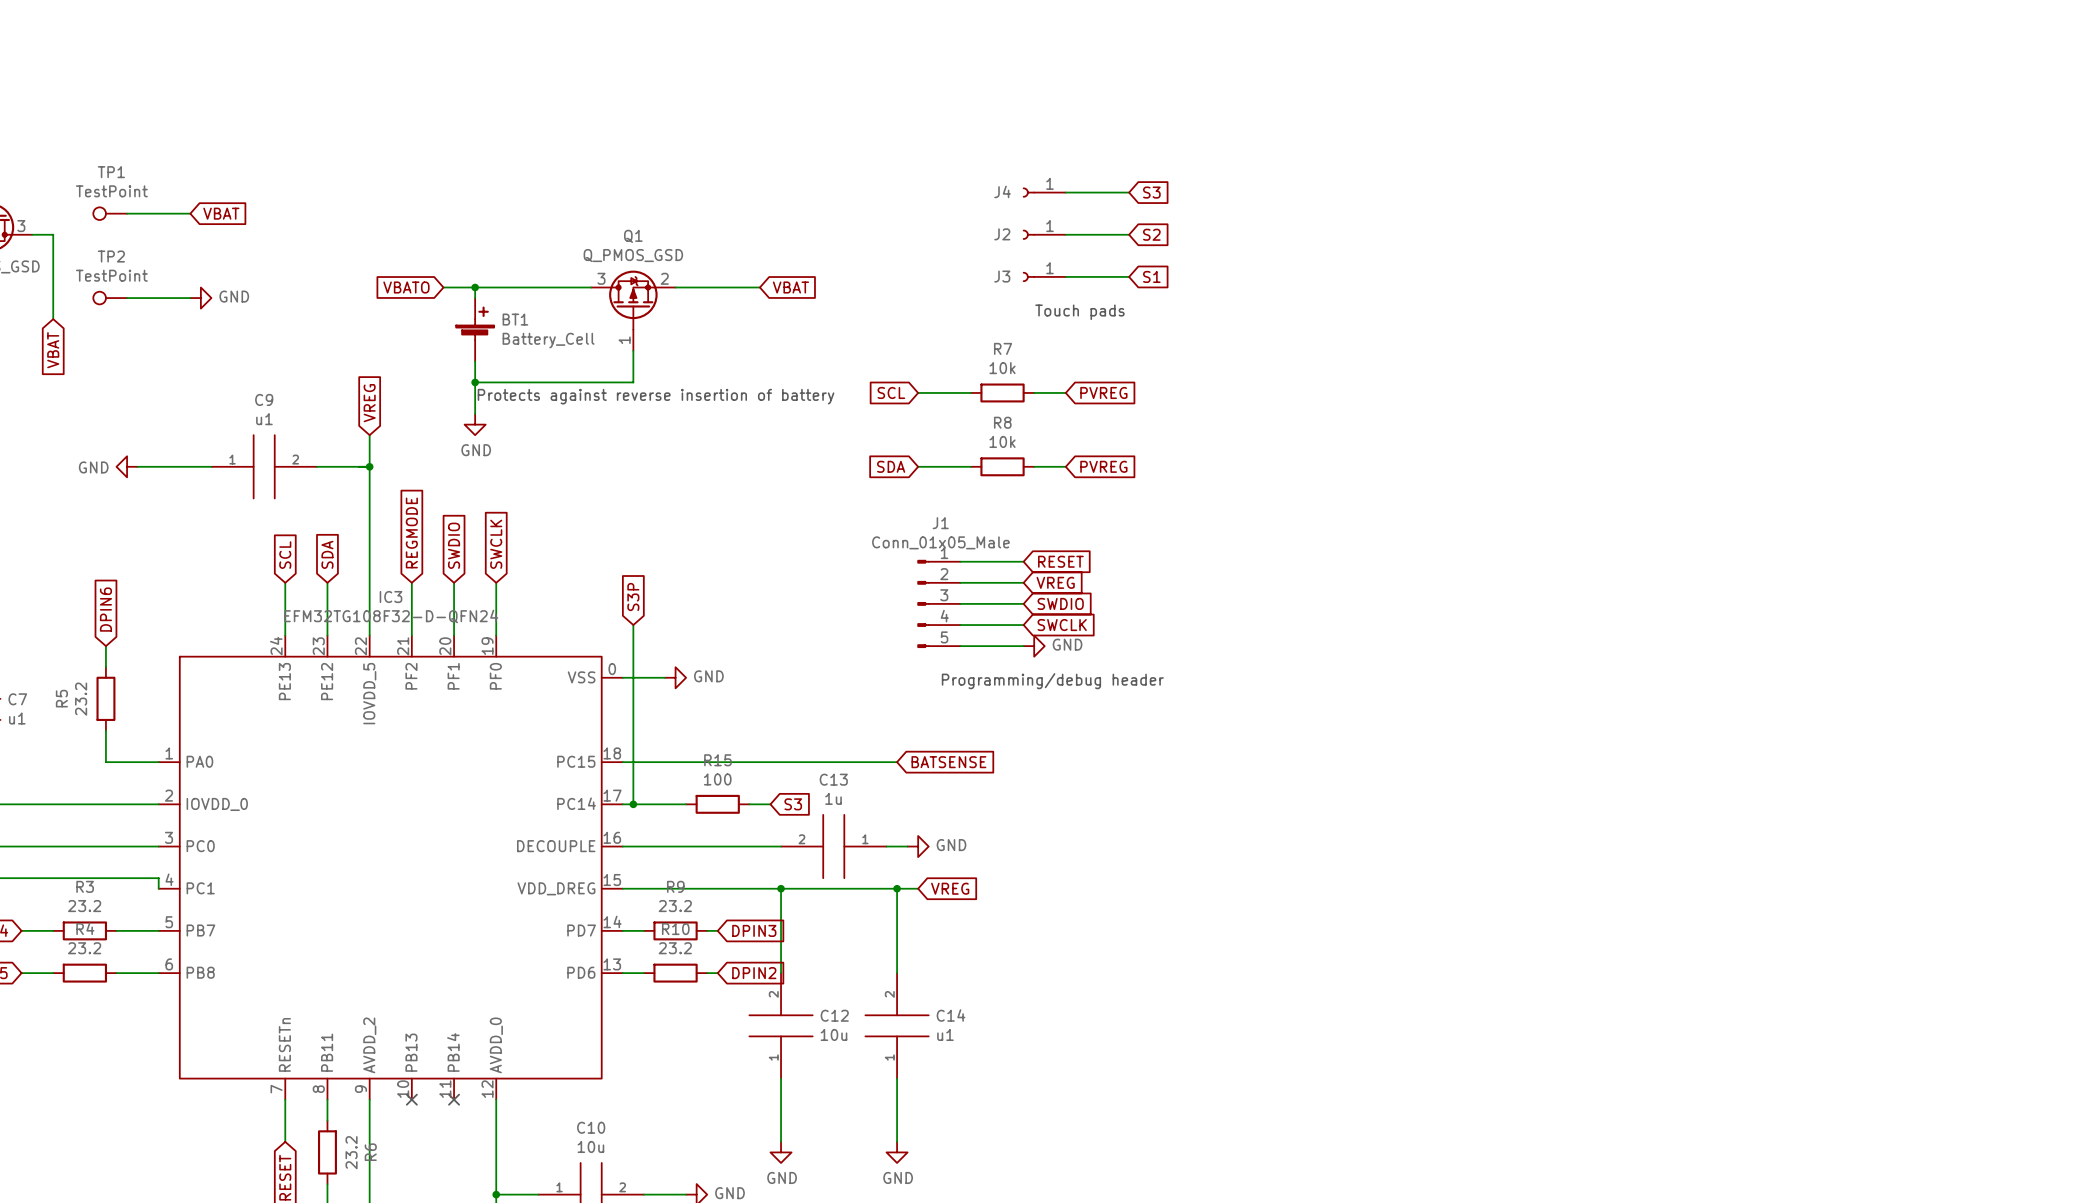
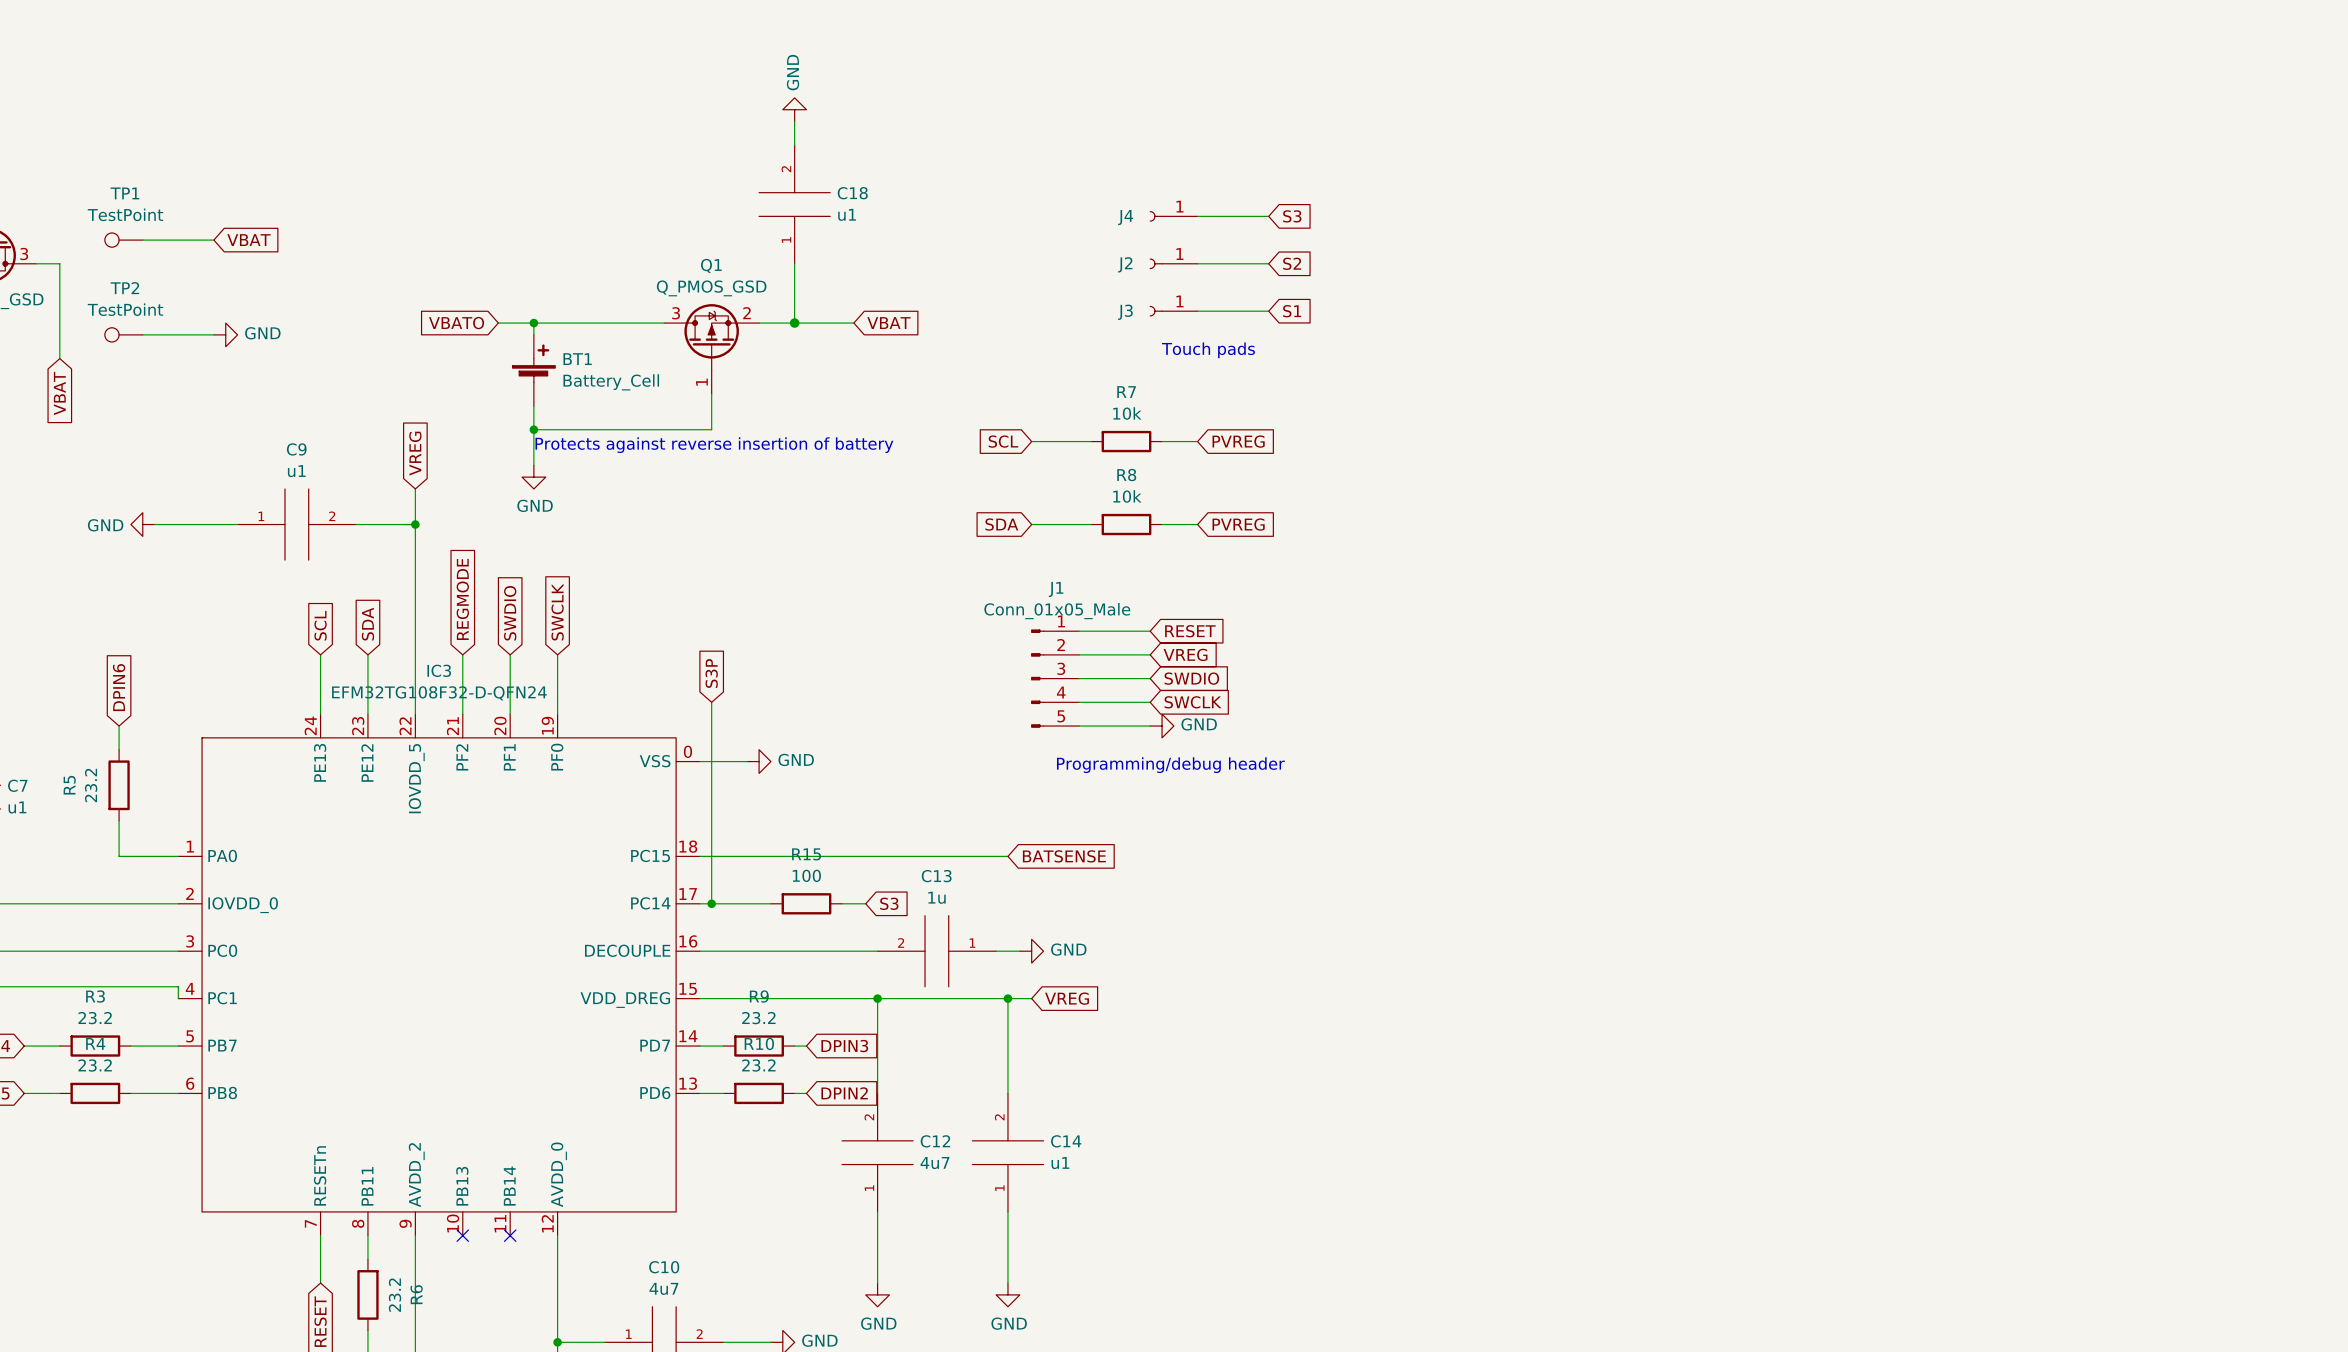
power symbol: none -> GND (794, 109)
wire: none -> (794, 121) (794, 145)
C18: none -> u1 (794, 204)
wire: none -> (794, 263) (794, 323)
junction: none -> (794, 323)
C12 value: 10u (833, 1034) -> 4u7 (934, 1163)
C10 value: 10u (590, 1146) -> 4u7 (663, 1288)

